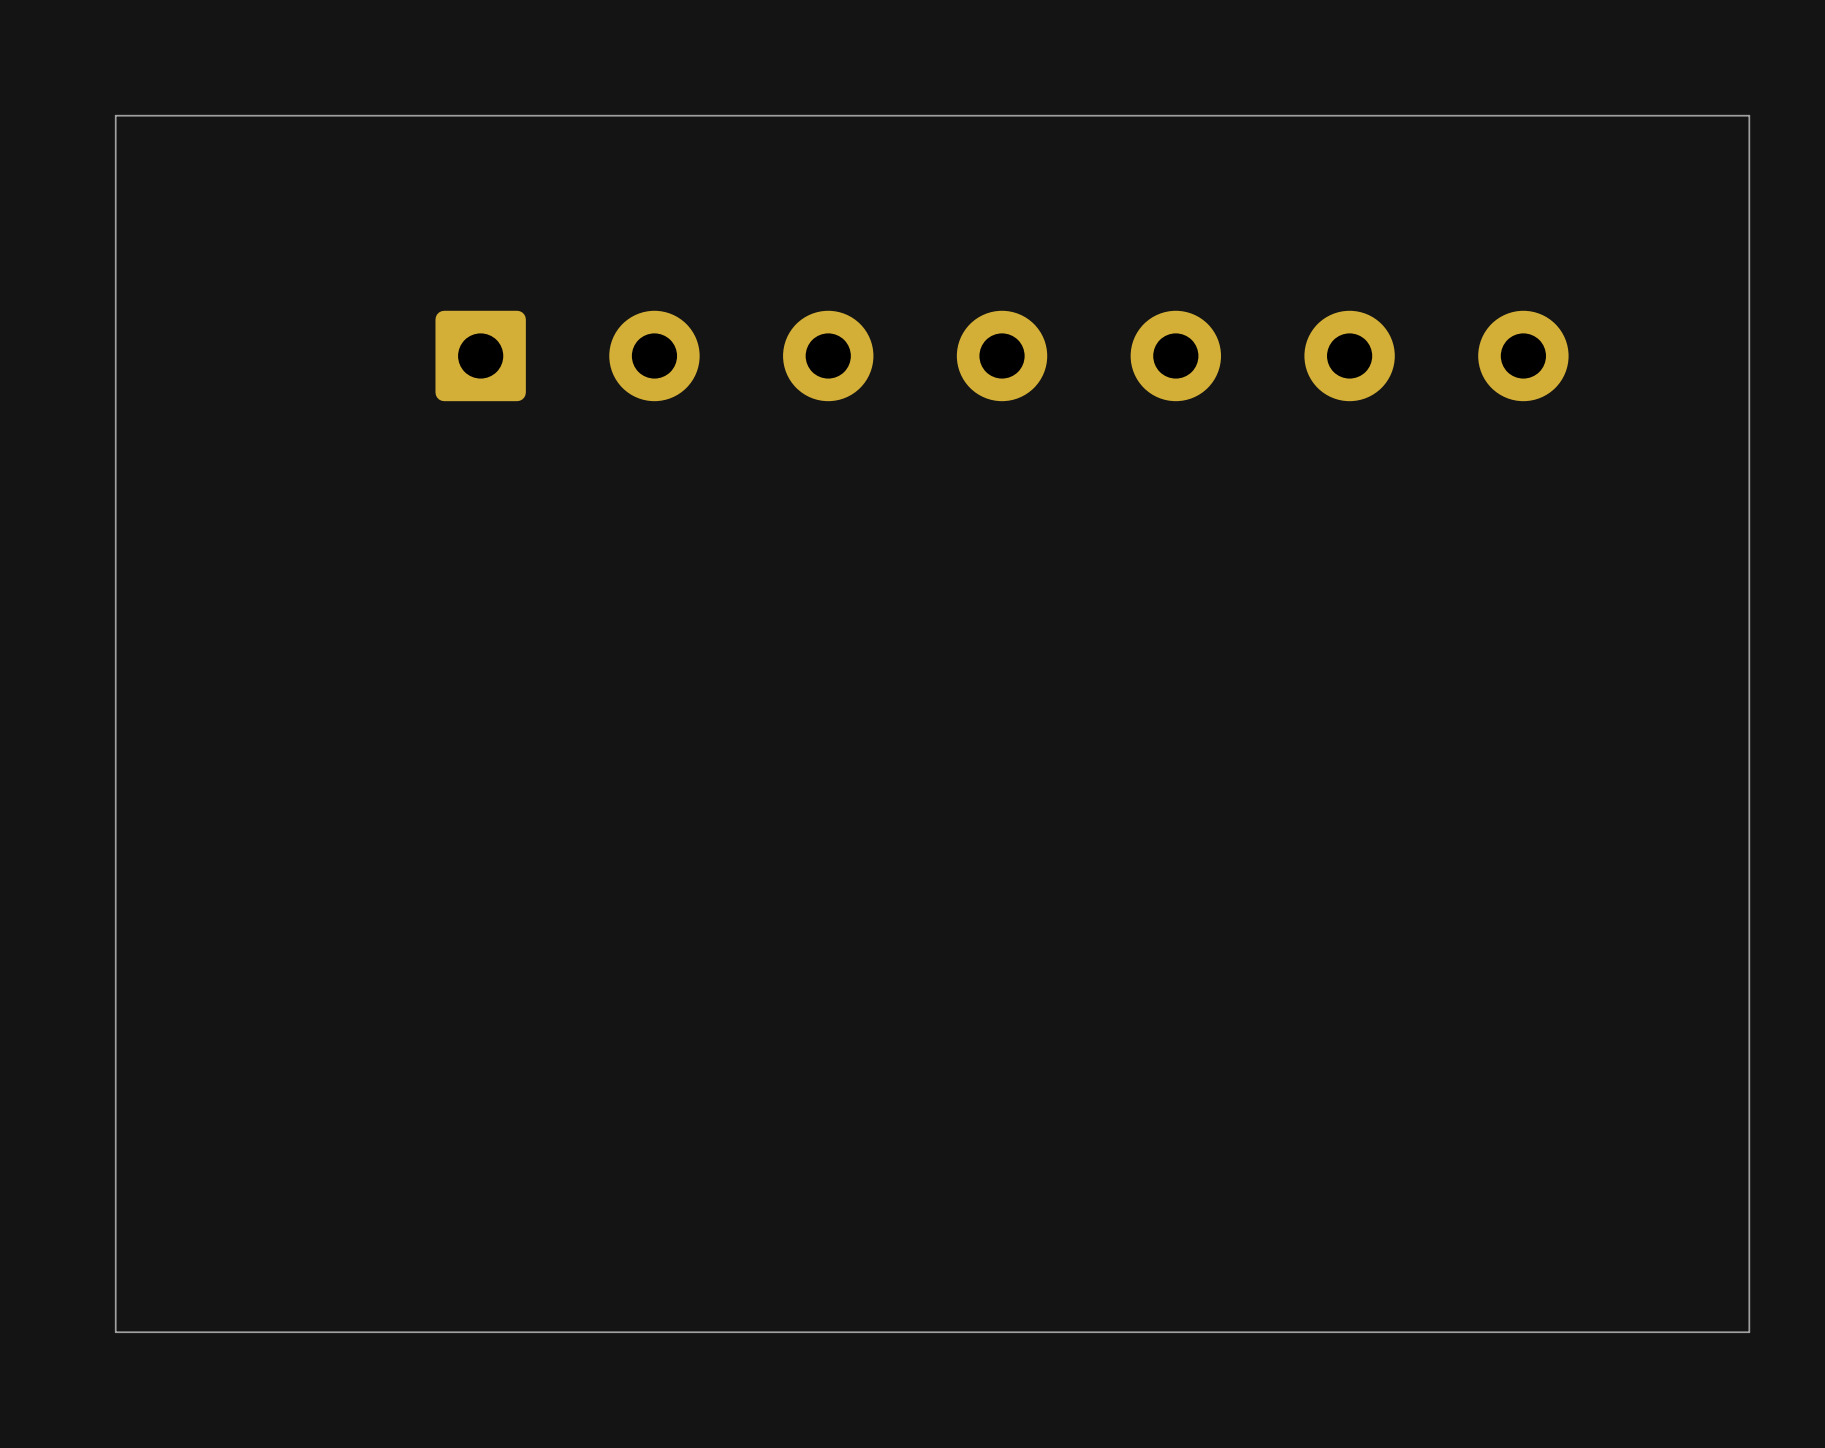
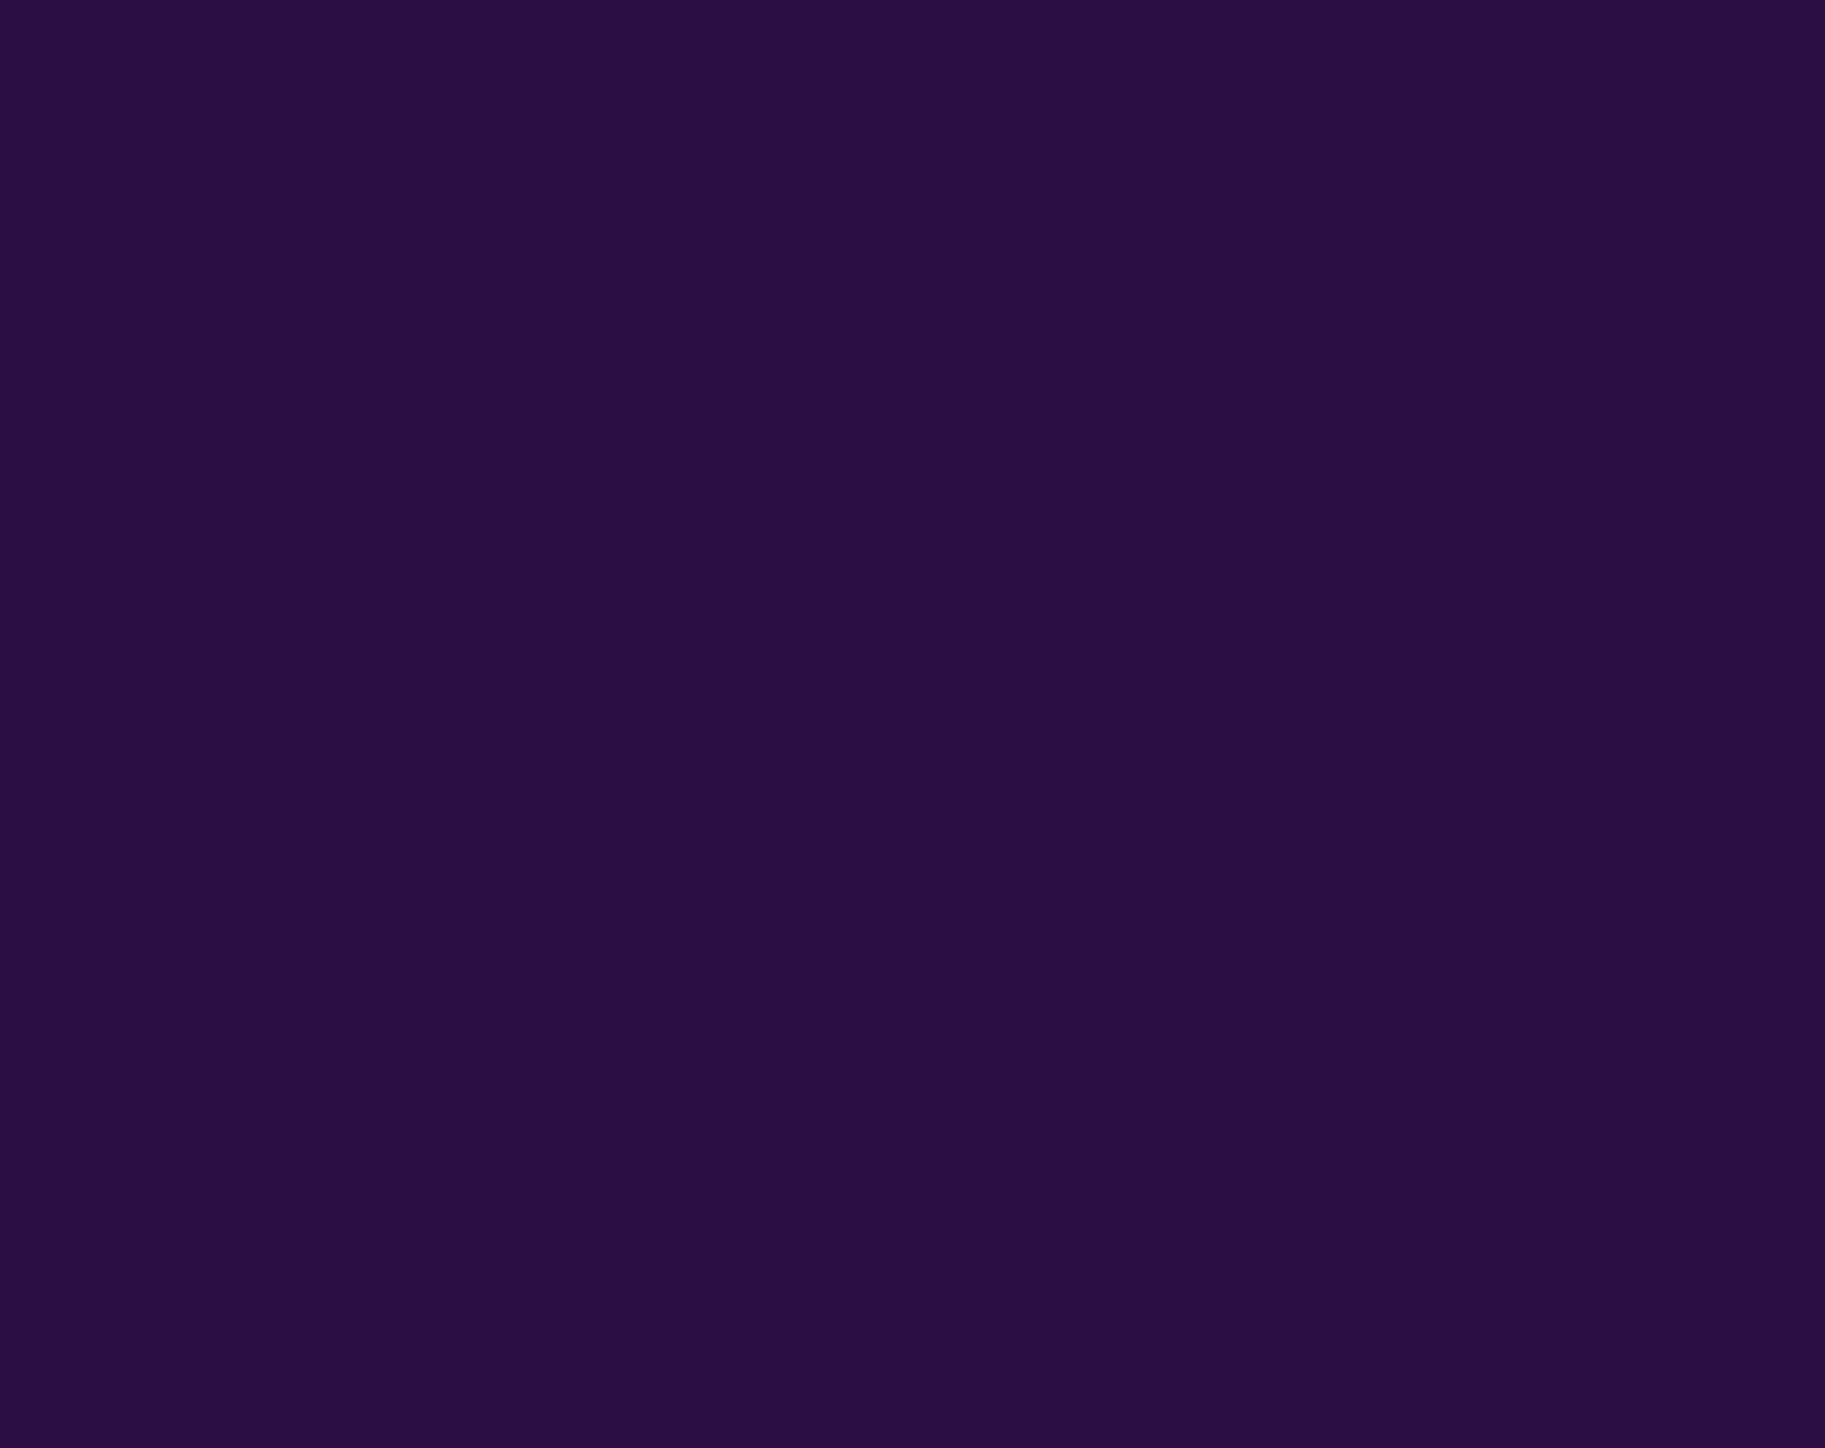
board edge: (1749, 115) (115, 115) (115, 1332) (1749, 1332) (1749, 115) -> none
part: (1002, 355) -> none

